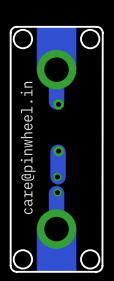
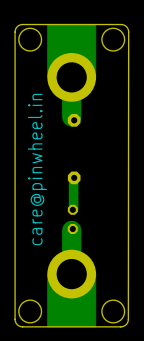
track width: thick (58, 152) (58, 176) -> thin (73, 179) (73, 209)

